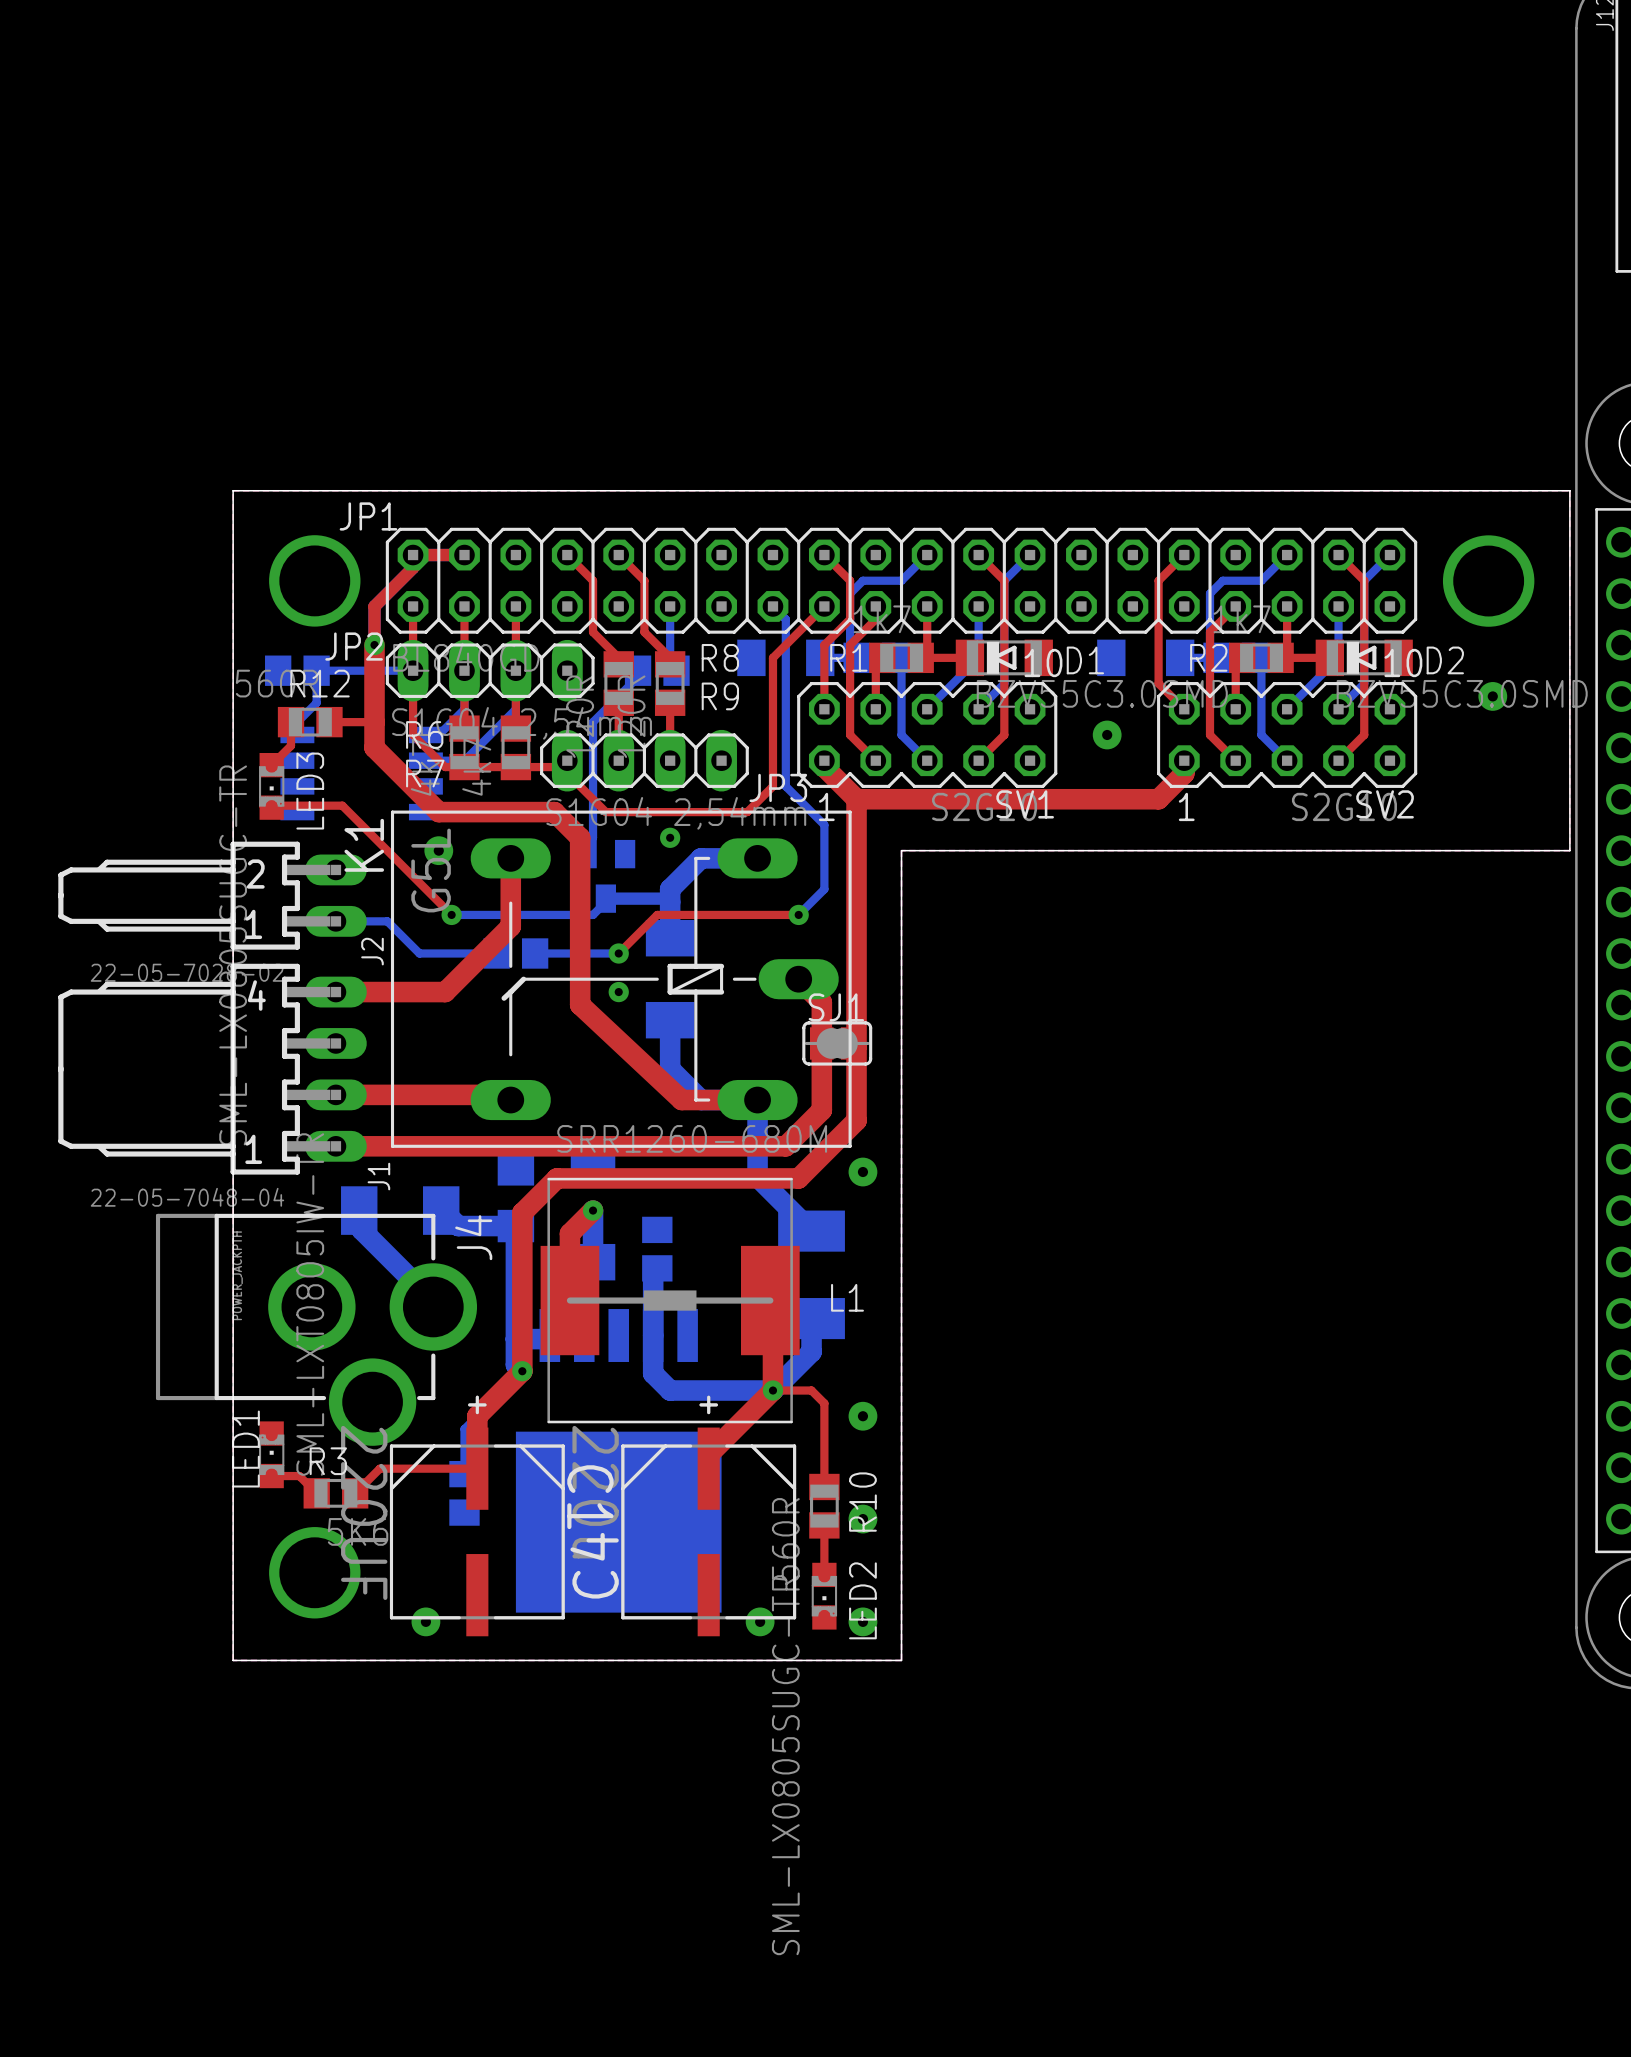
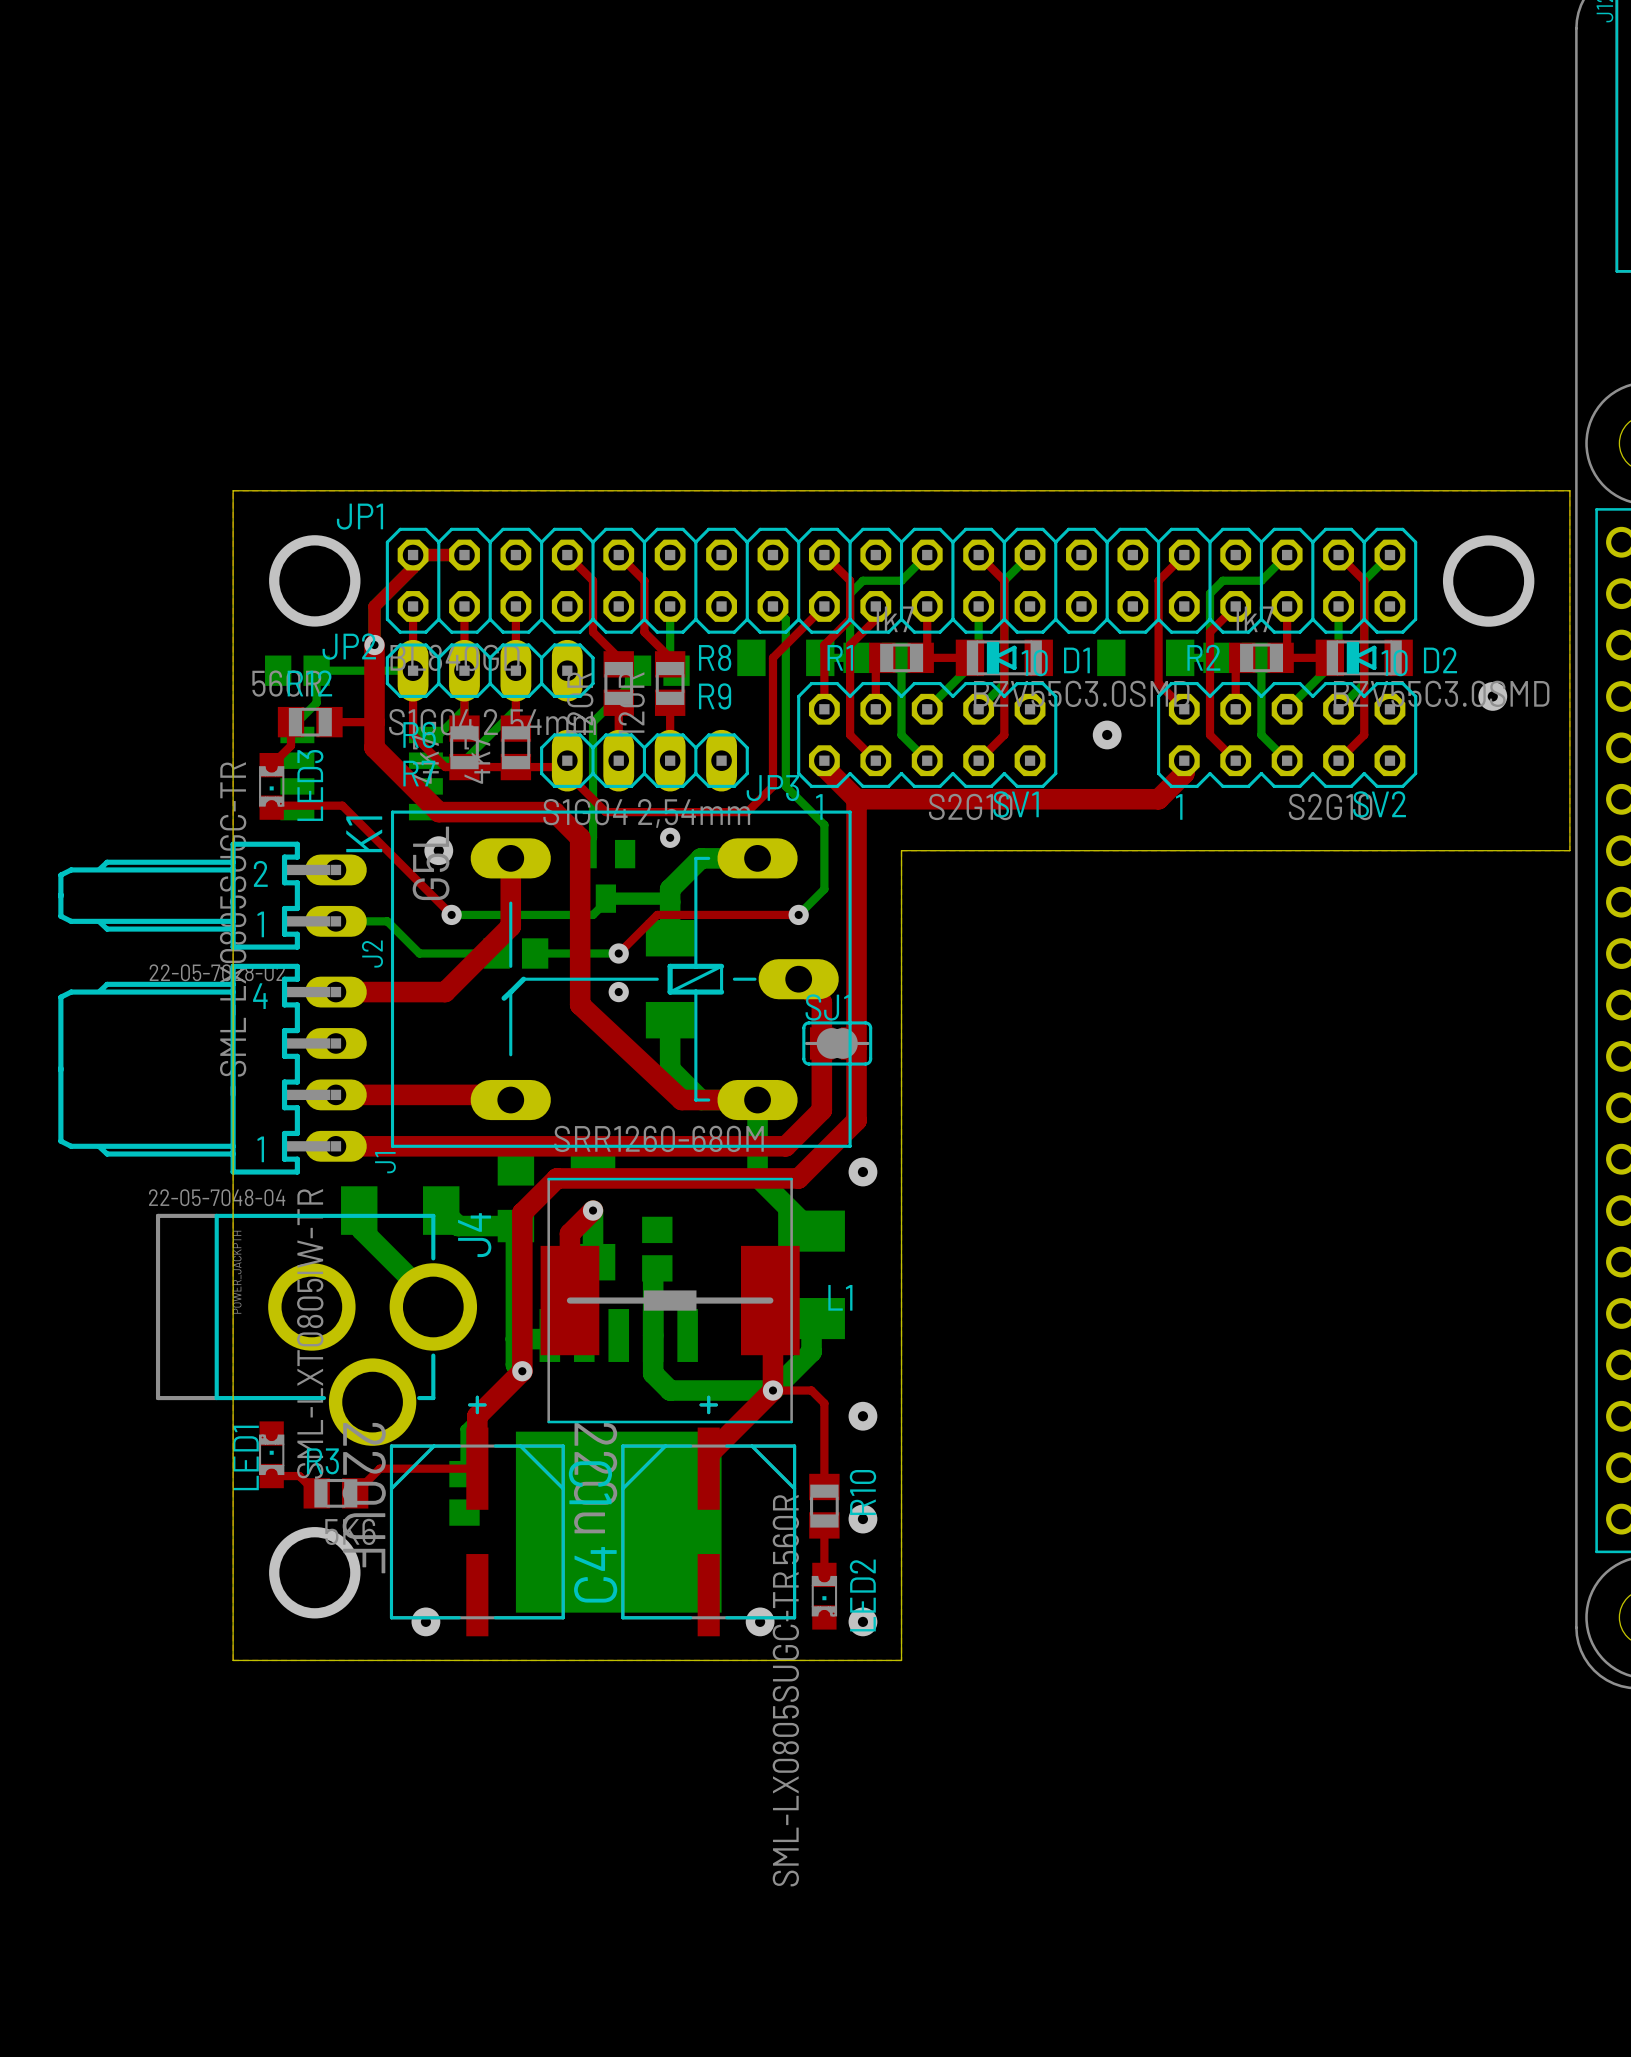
J1 name position: J1 (378, 1176) -> J1 (385, 1162)

